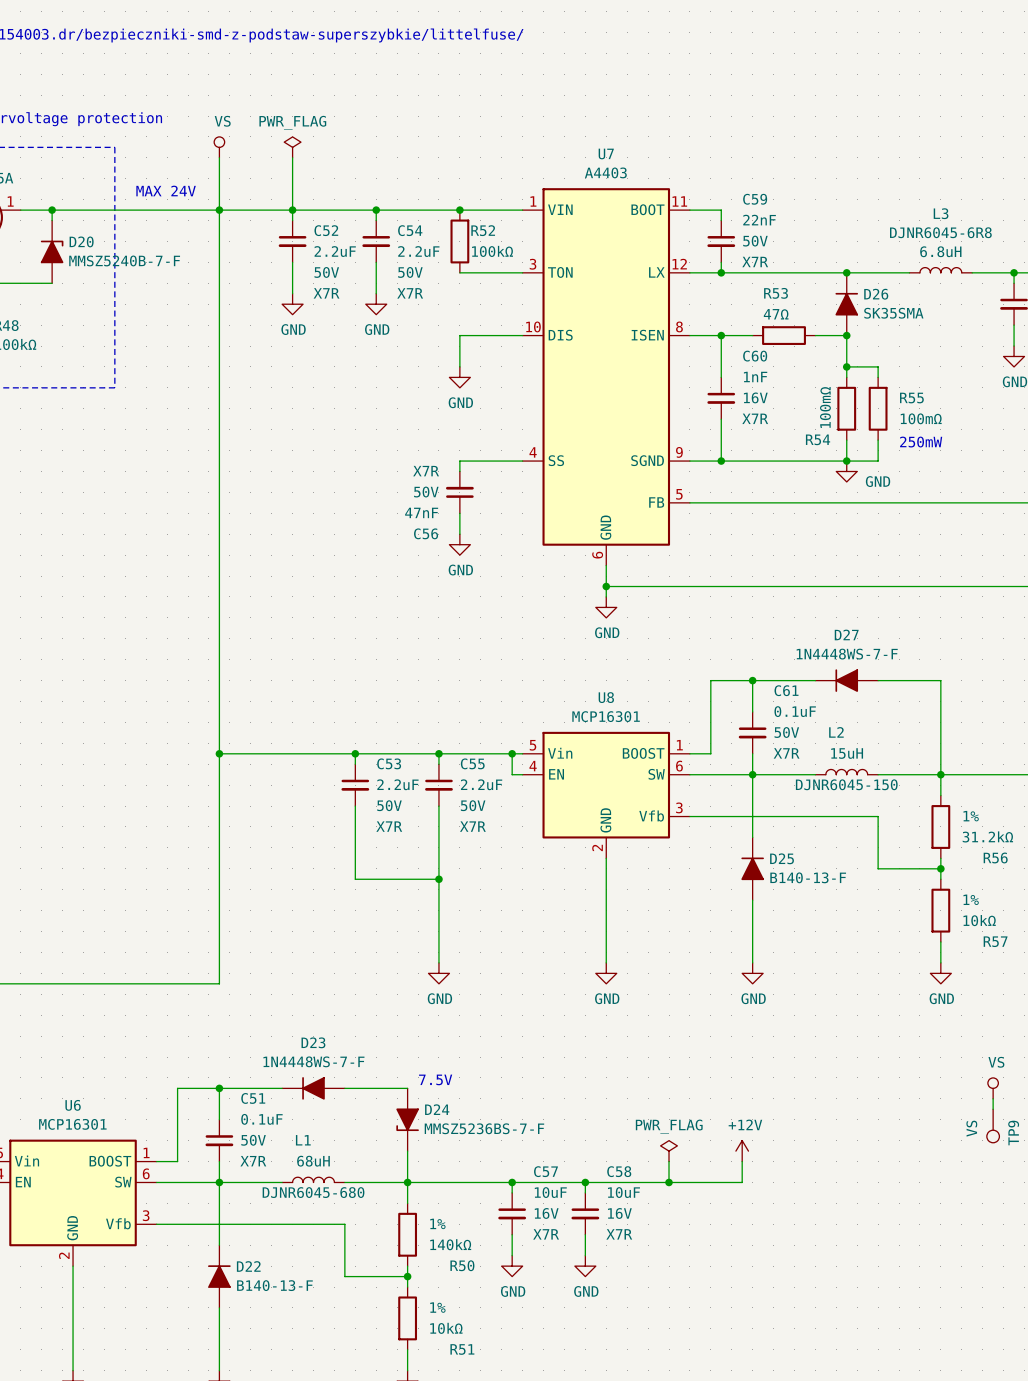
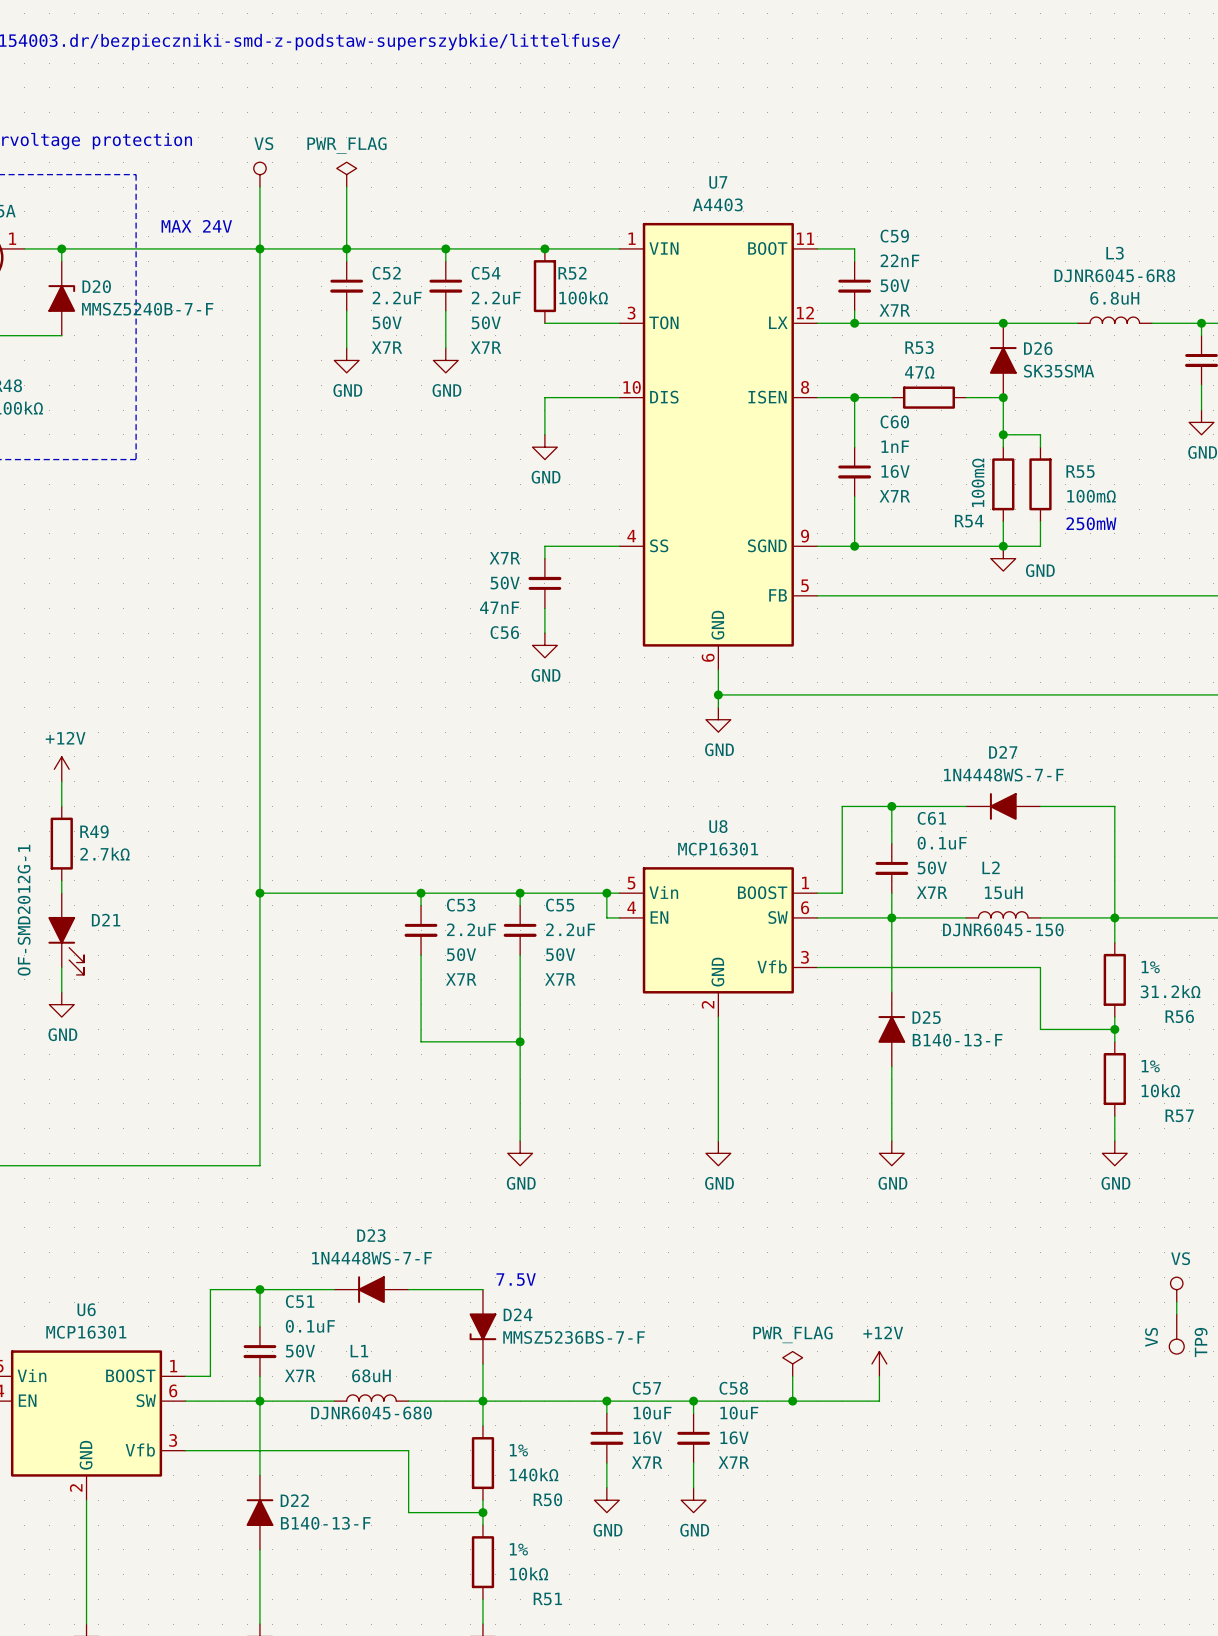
power symbol: none -> +12V (61, 769)
wire: none -> (61, 781) (61, 806)
R49: none -> 2.7kΩ (61, 843)
wire: none -> (61, 880) (61, 893)
D21: none -> OF-SMD2012G-1 (66, 934)
wire: none -> (61, 967) (61, 992)
power symbol: none -> GND (61, 1004)

